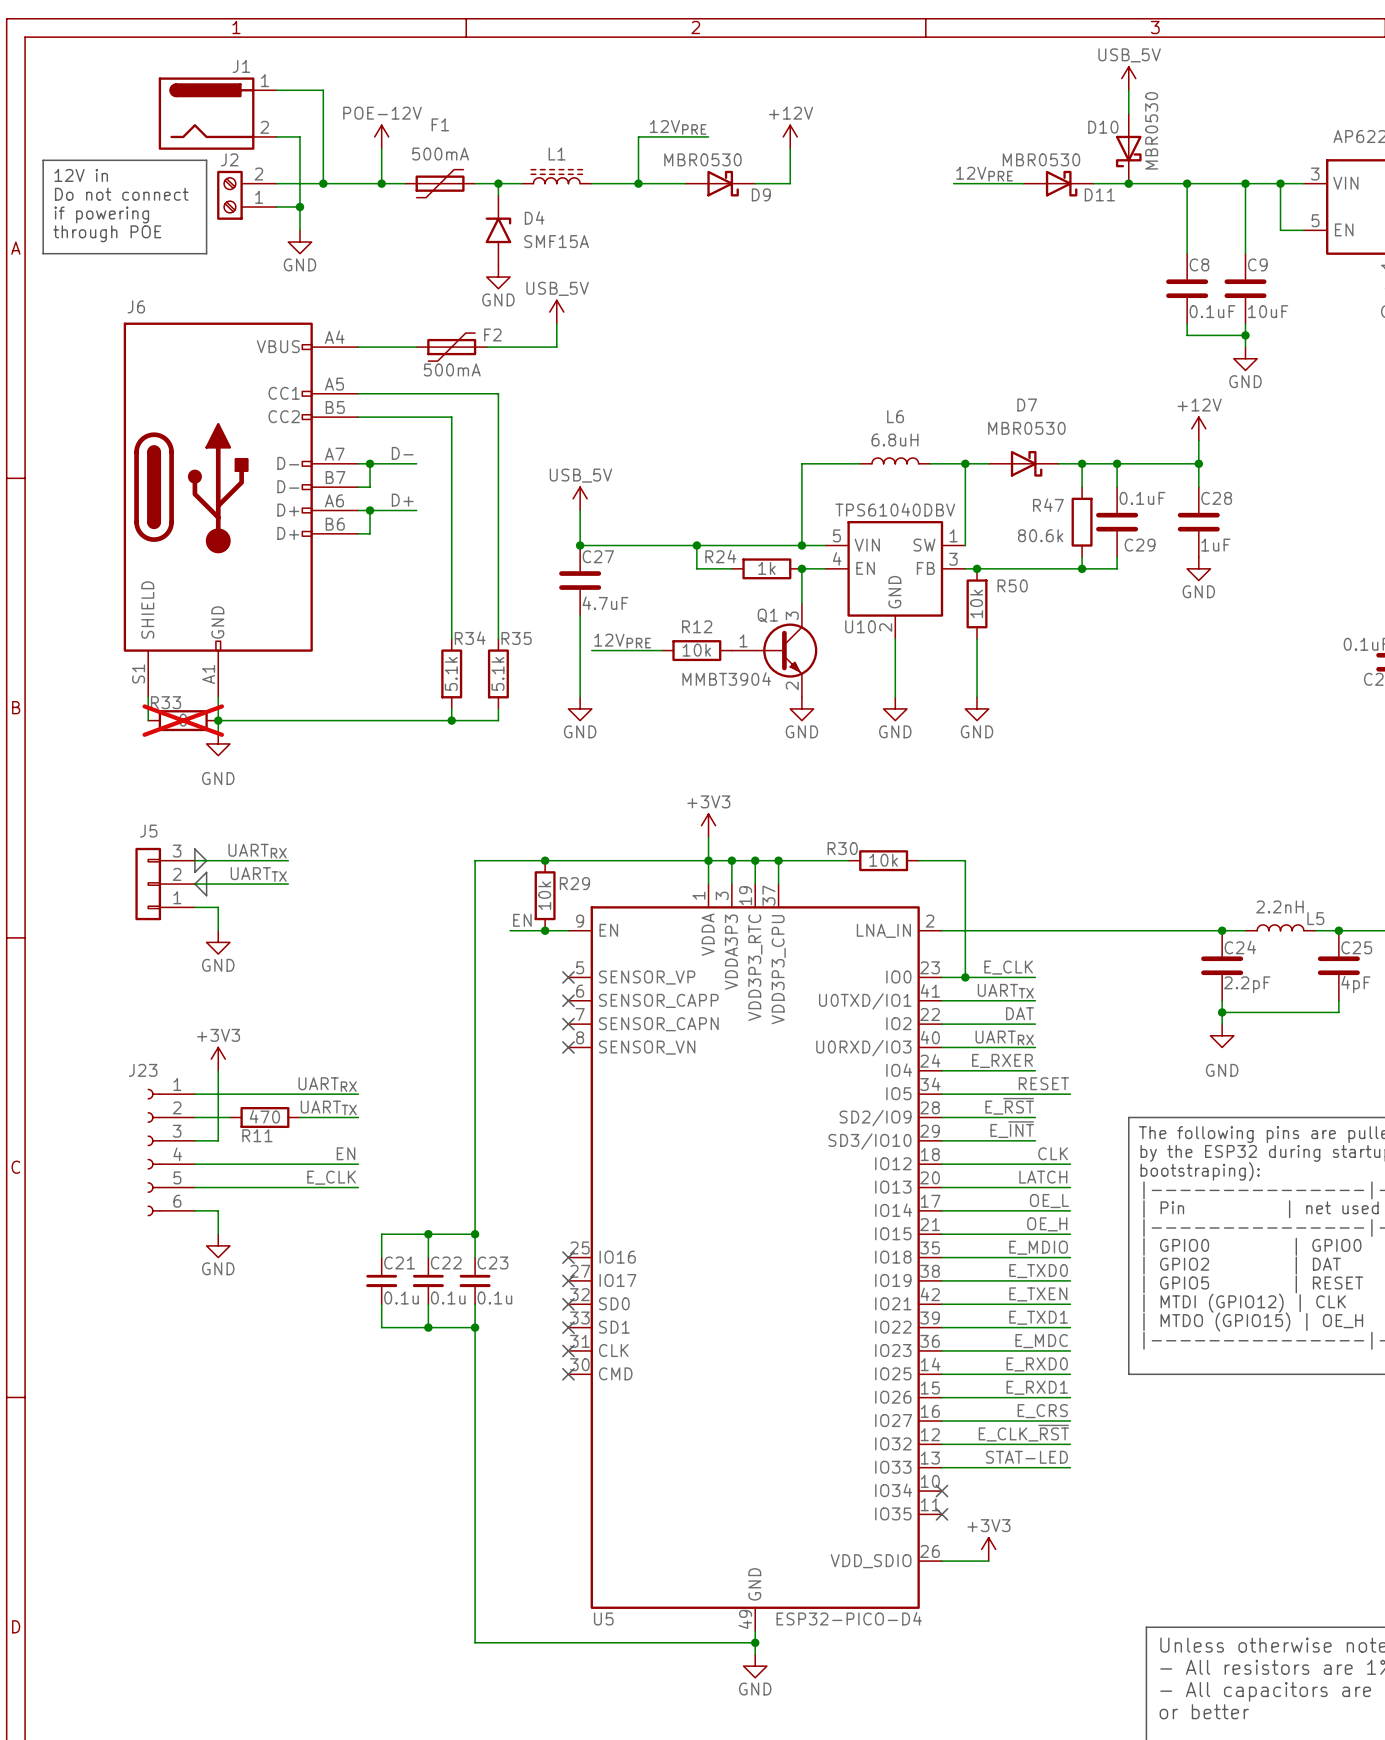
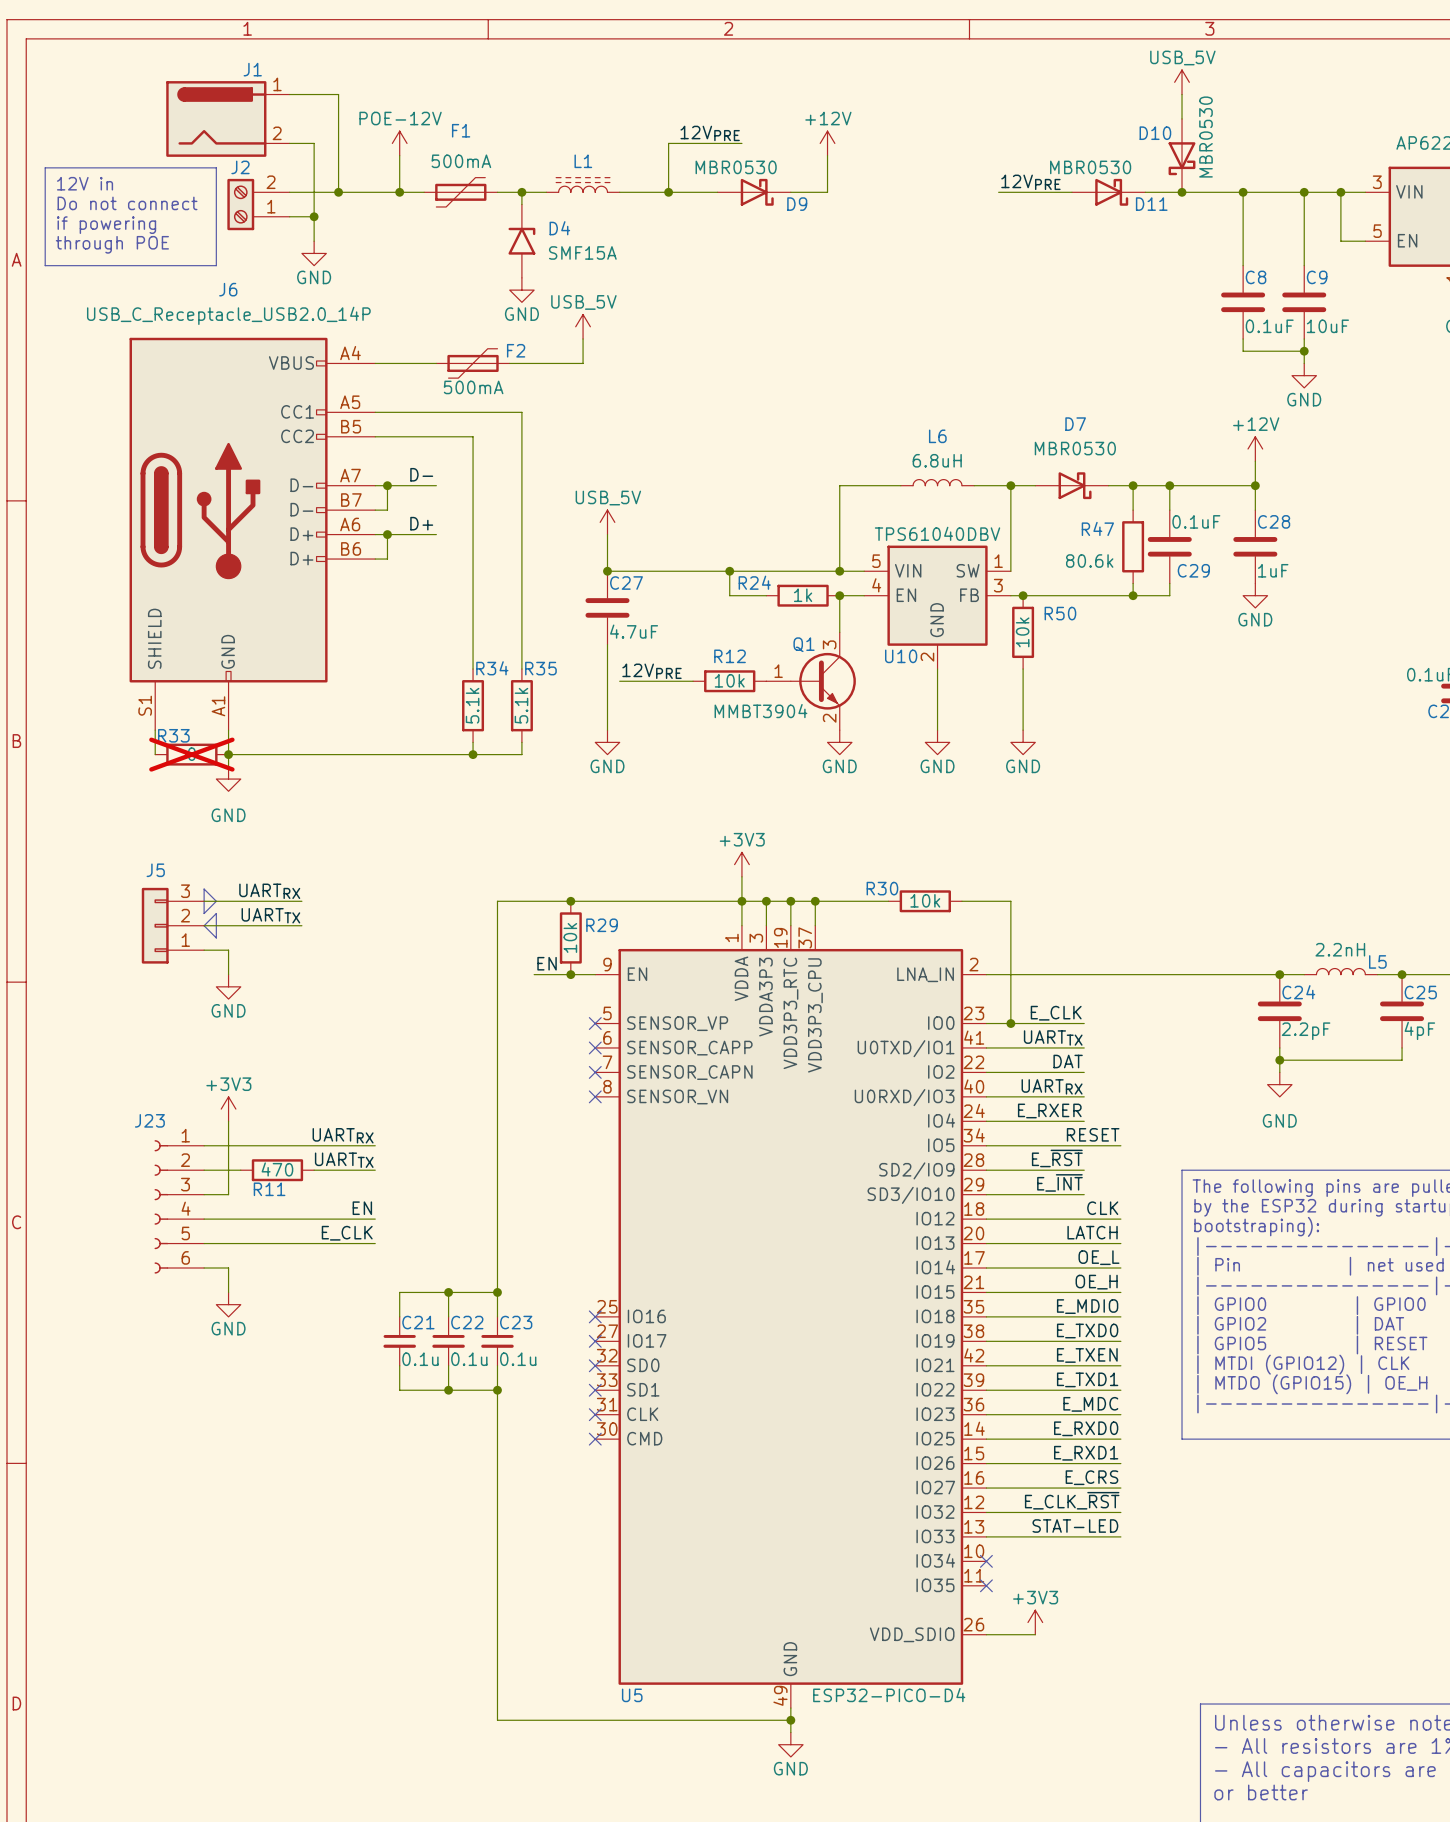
J6 value: none -> USB_C_Receptacle_USB2.0_14P (228, 315)
J6 name position: J6 (136, 306) -> J6 (228, 289)

